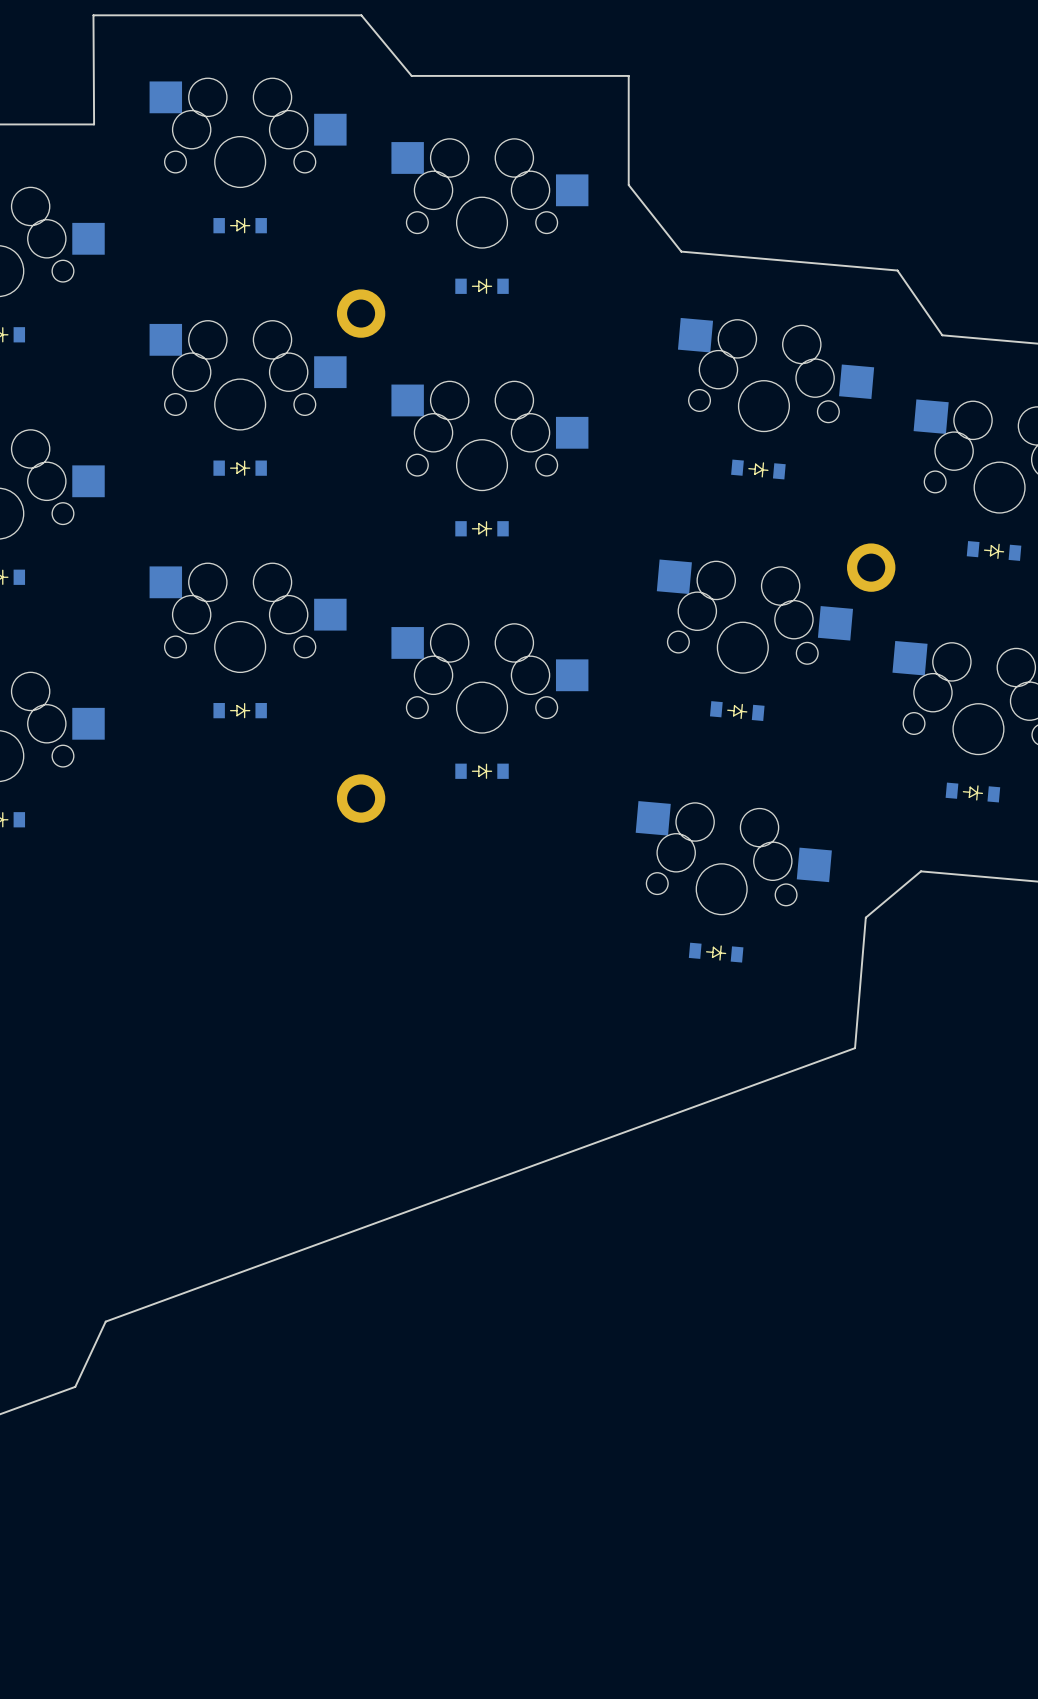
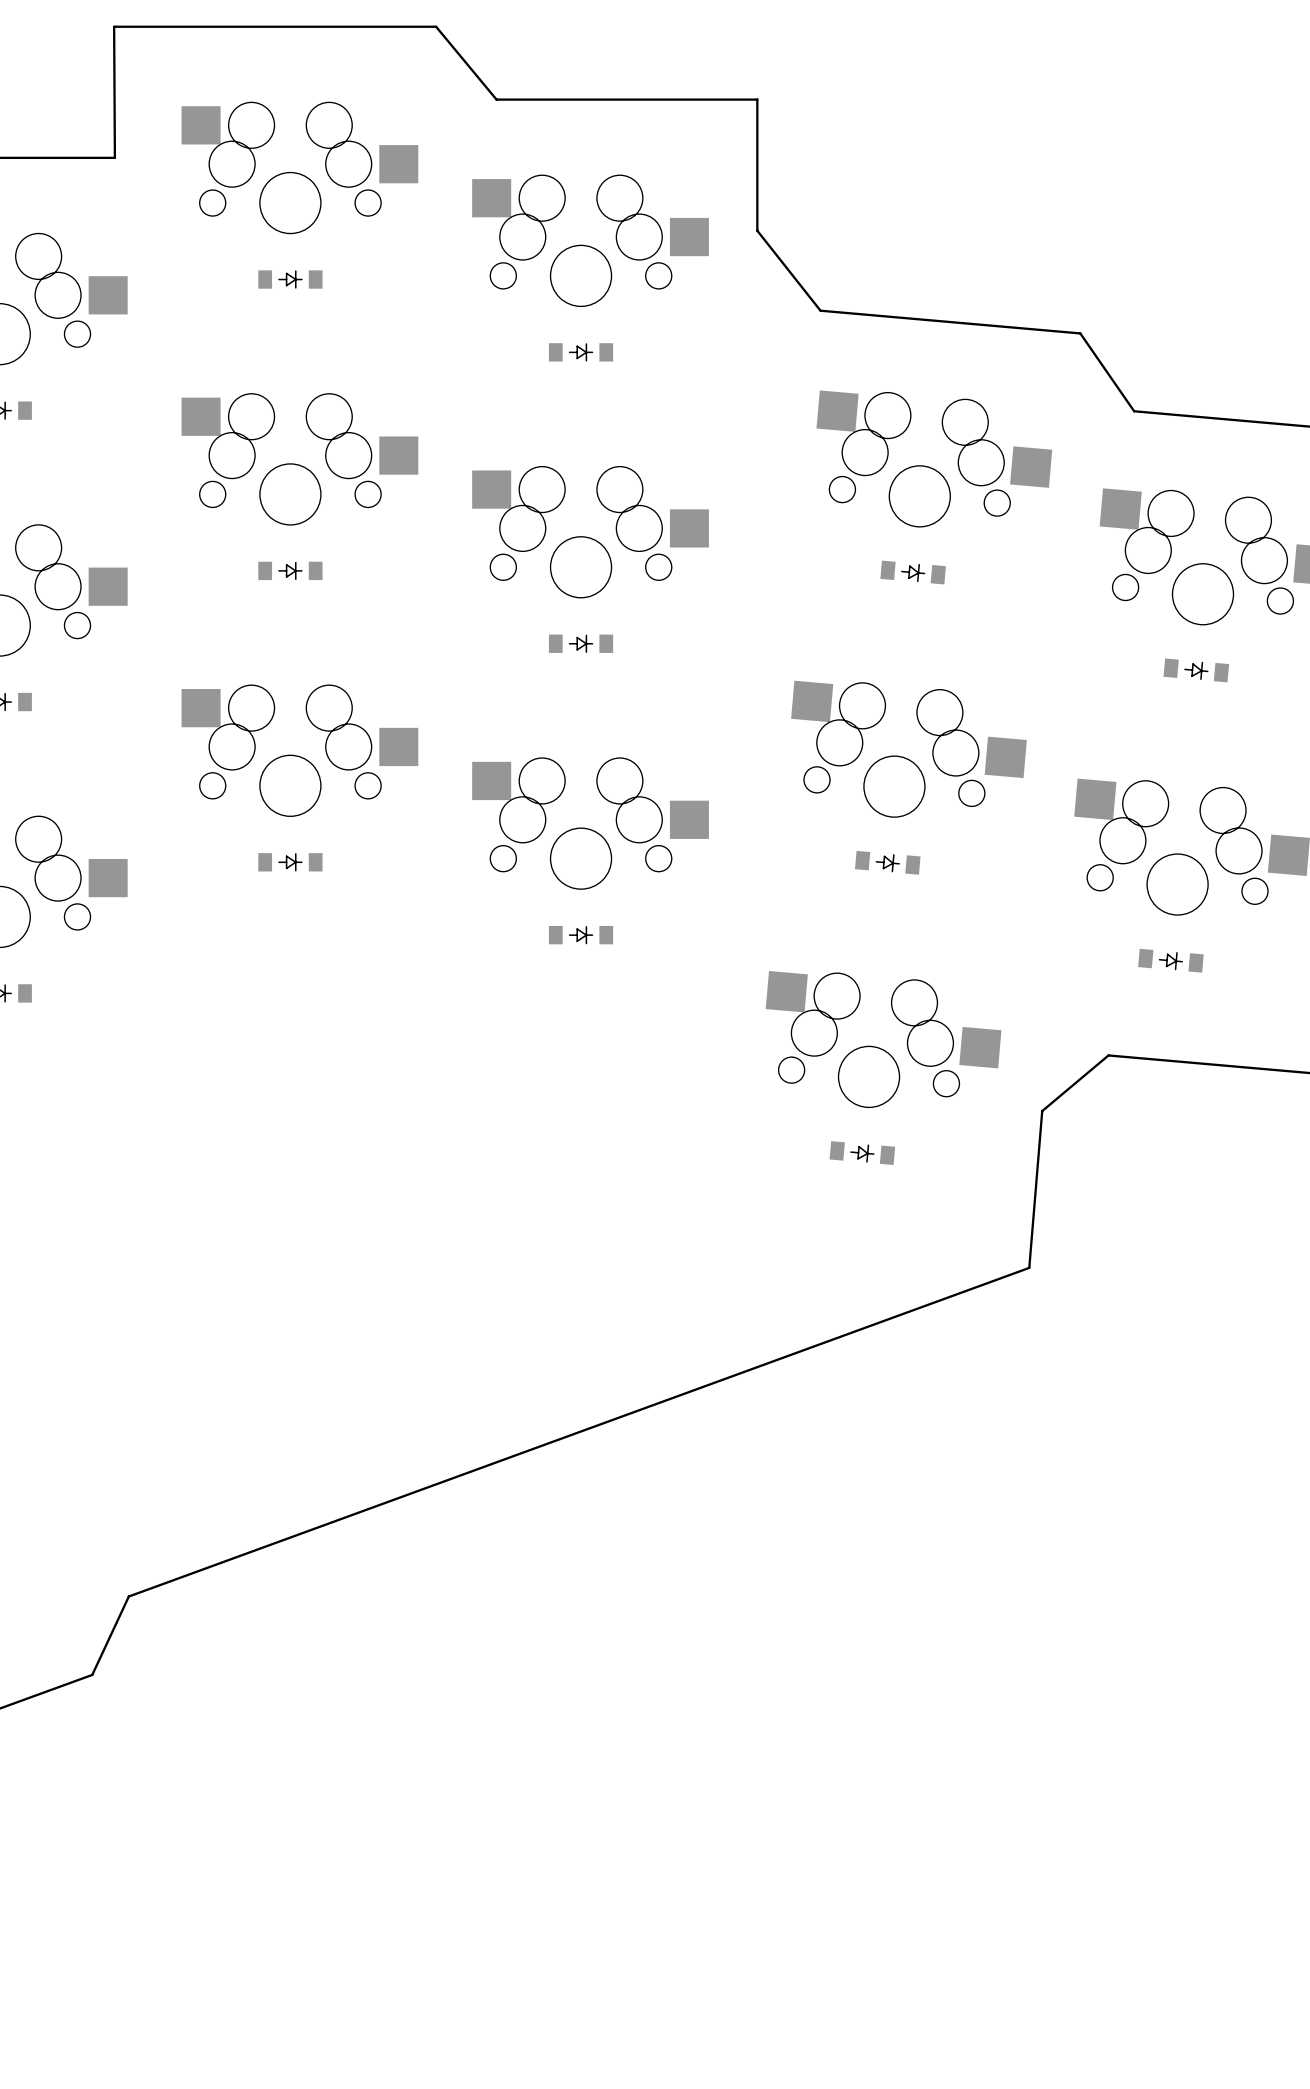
part: (361, 313) -> none
part: (871, 567) -> none
part: (361, 798) -> none

